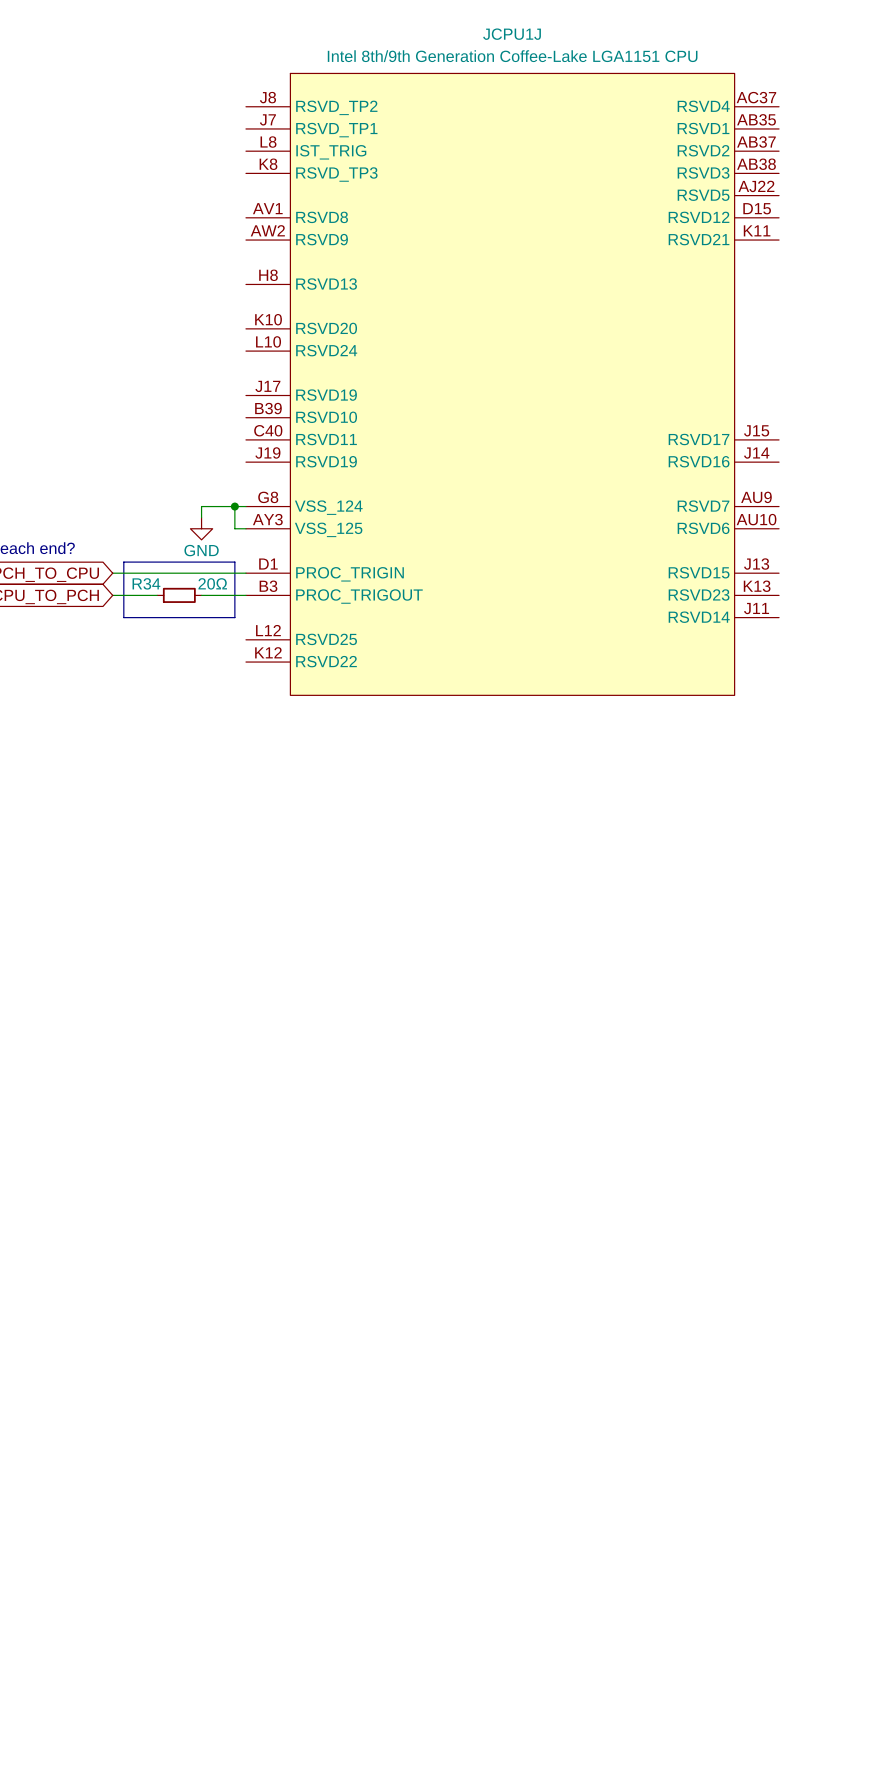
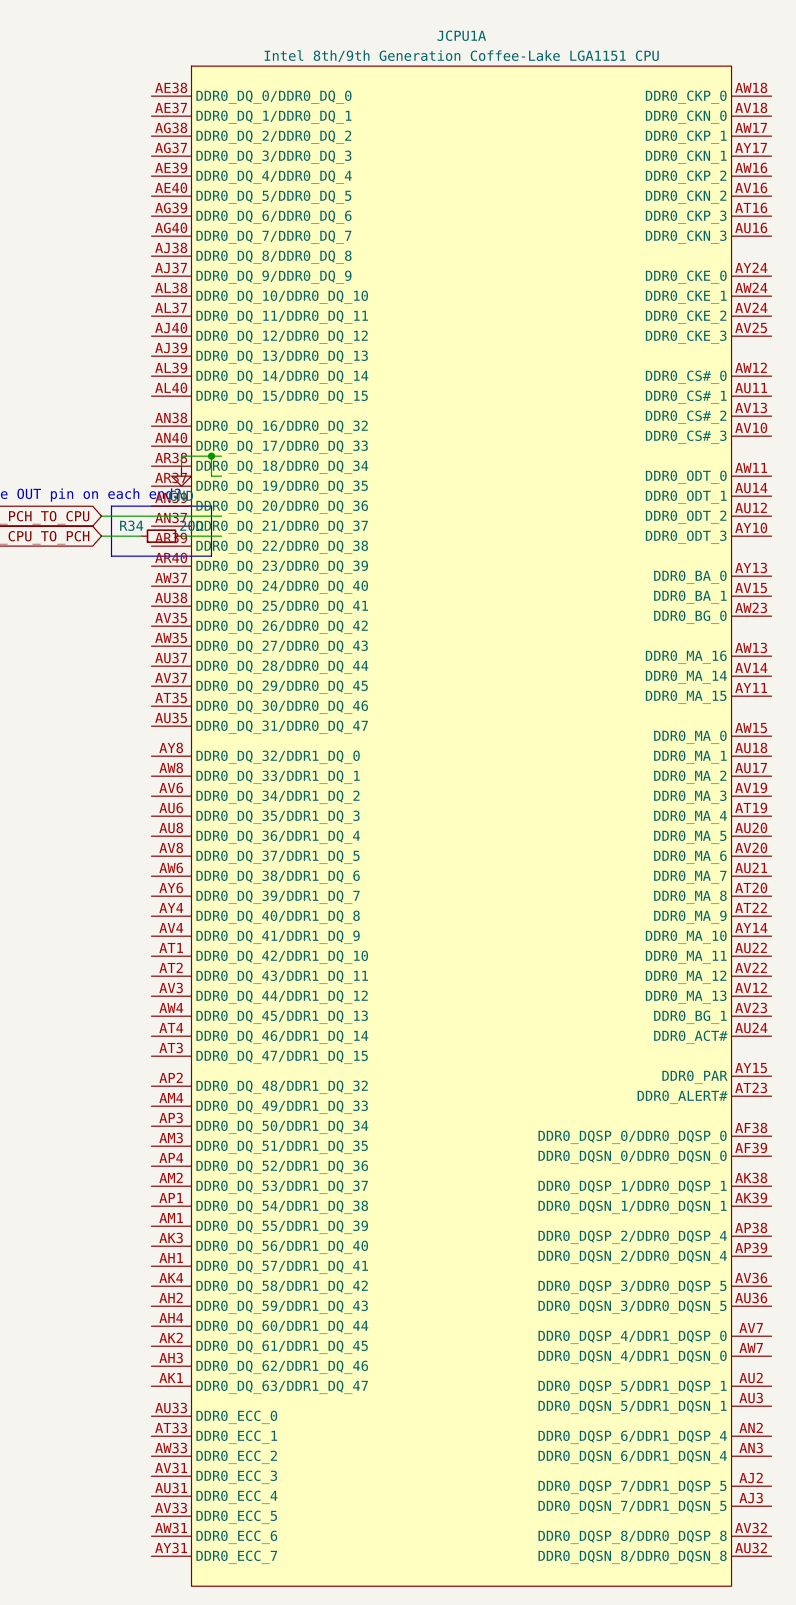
JCPU1J: Intel 8th/9th Generation Coffee-Lake LGA1151 CPU (512, 384) -> none
JCPU1A: none -> Intel 8th/9th Generation Coffee-Lake LGA1151 CPU (461, 826)

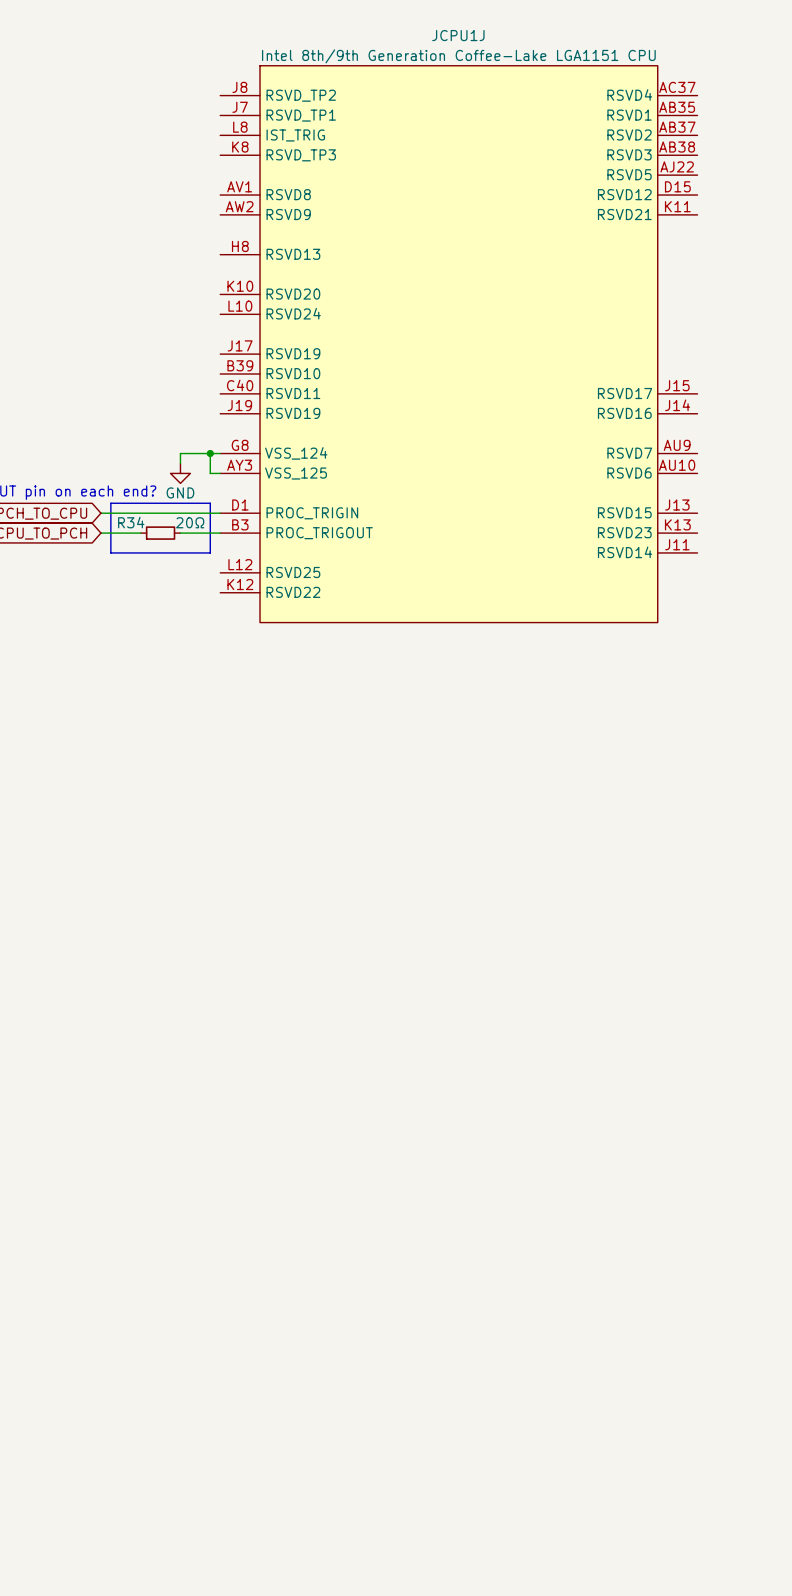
JCPU1J: none -> Intel 8th/9th Generation Coffee-Lake LGA1151 CPU (458, 344)
JCPU1A: Intel 8th/9th Generation Coffee-Lake LGA1151 CPU (461, 826) -> none

